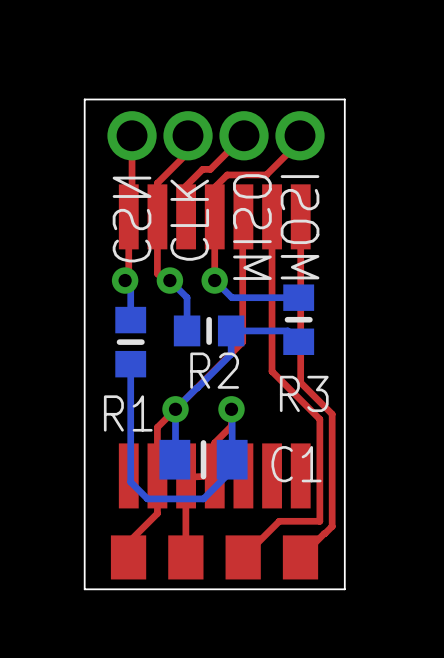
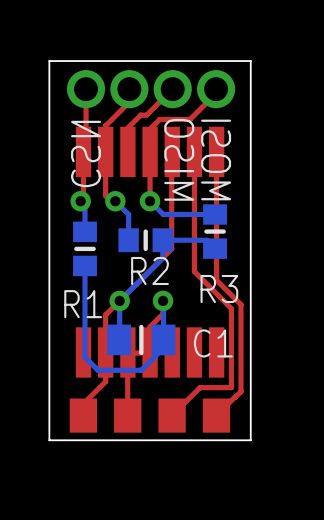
text: CLK (189, 220) -> none

